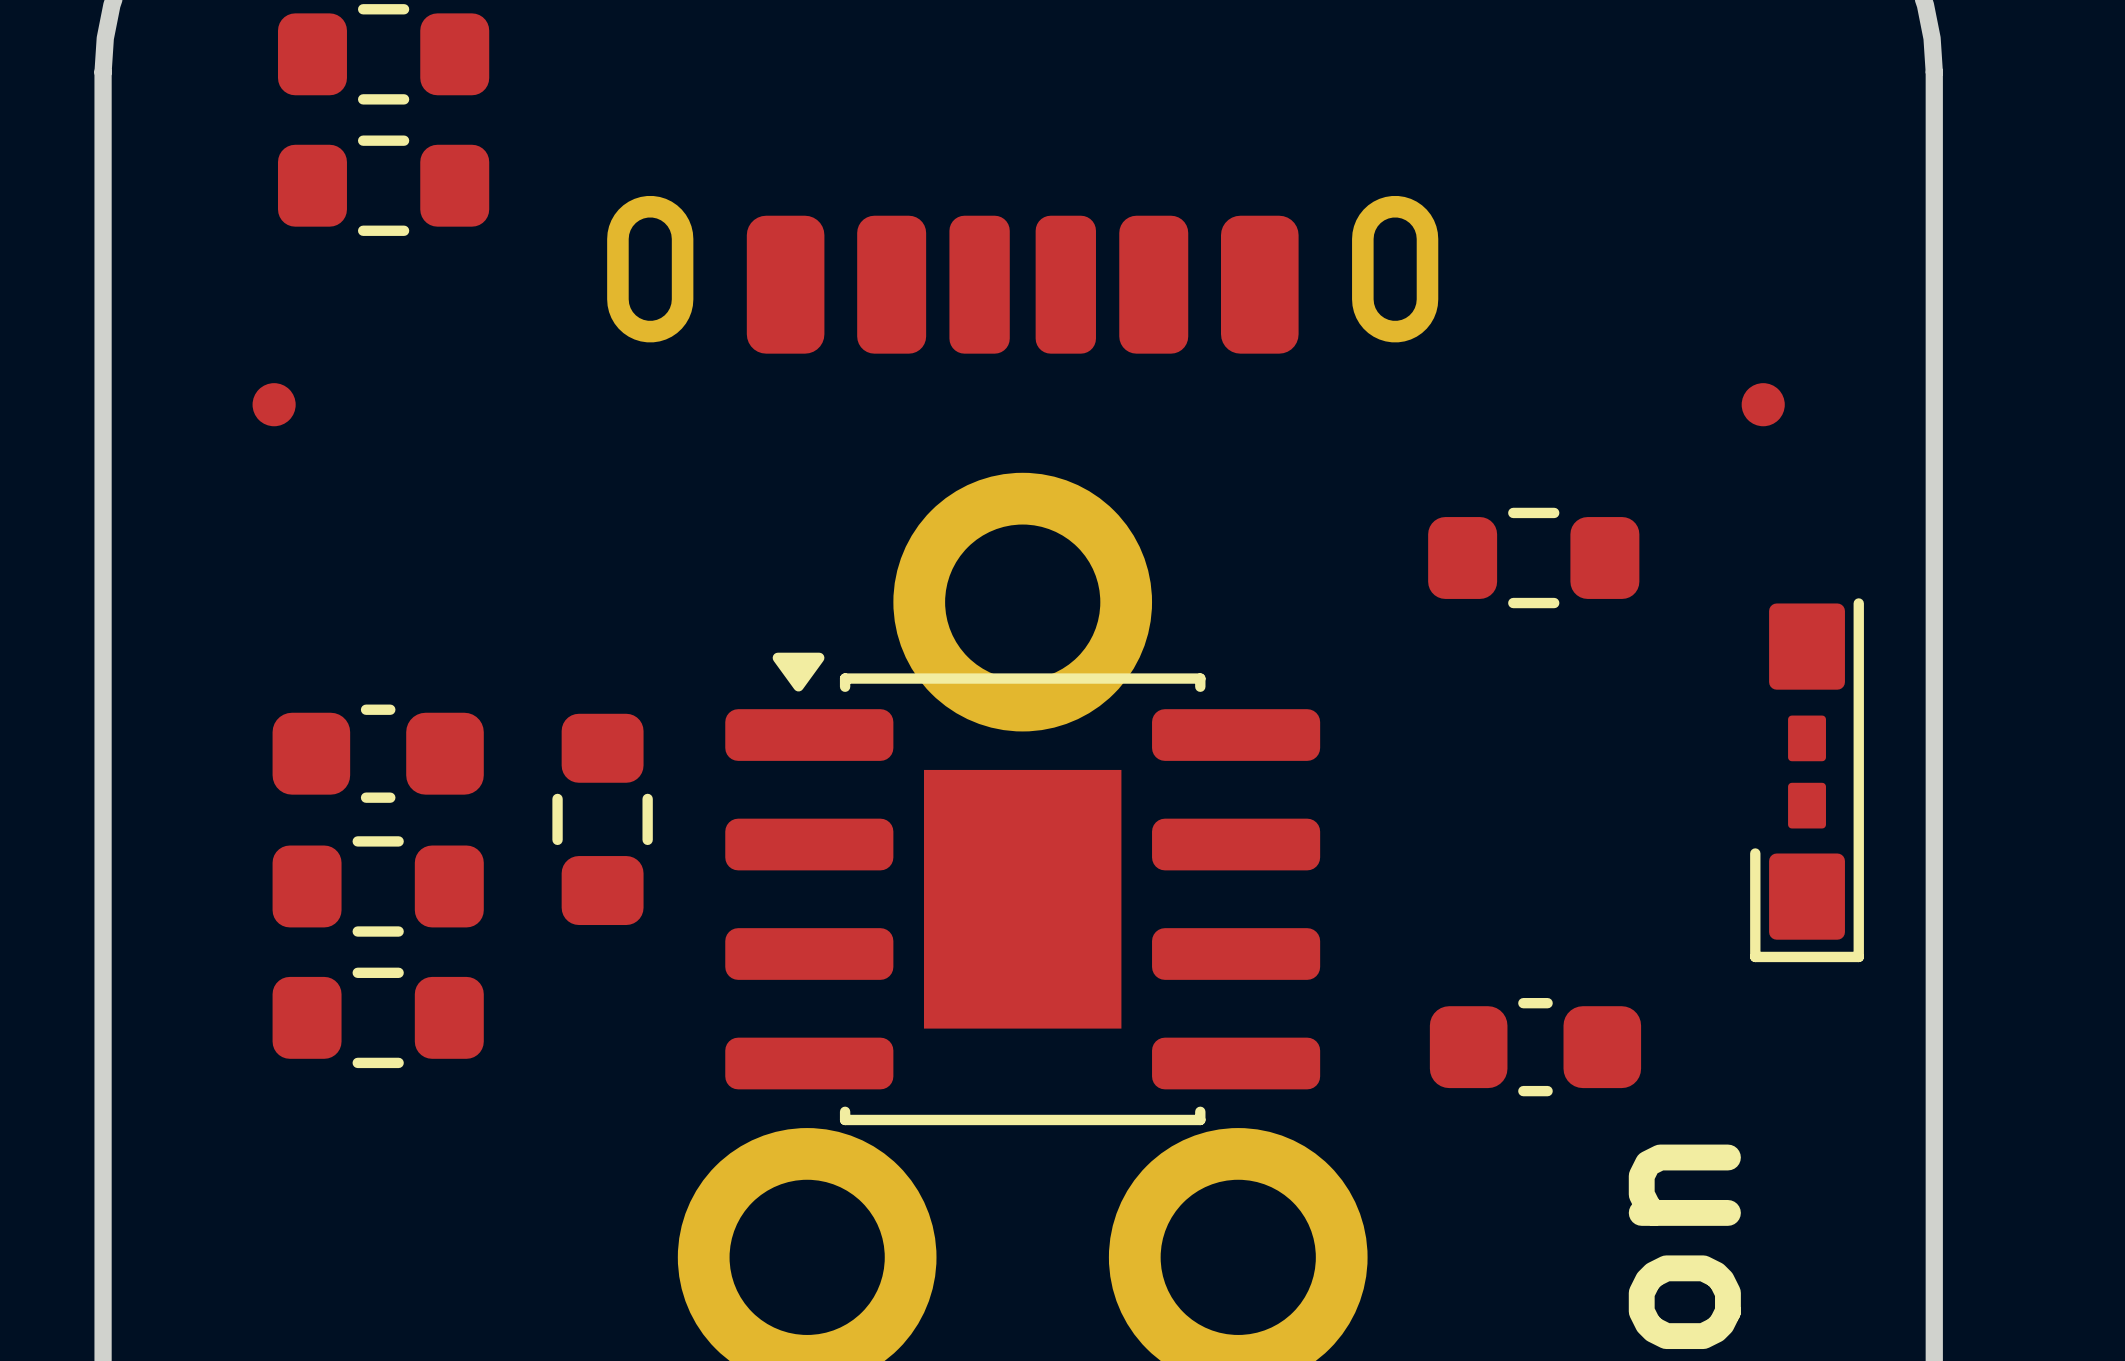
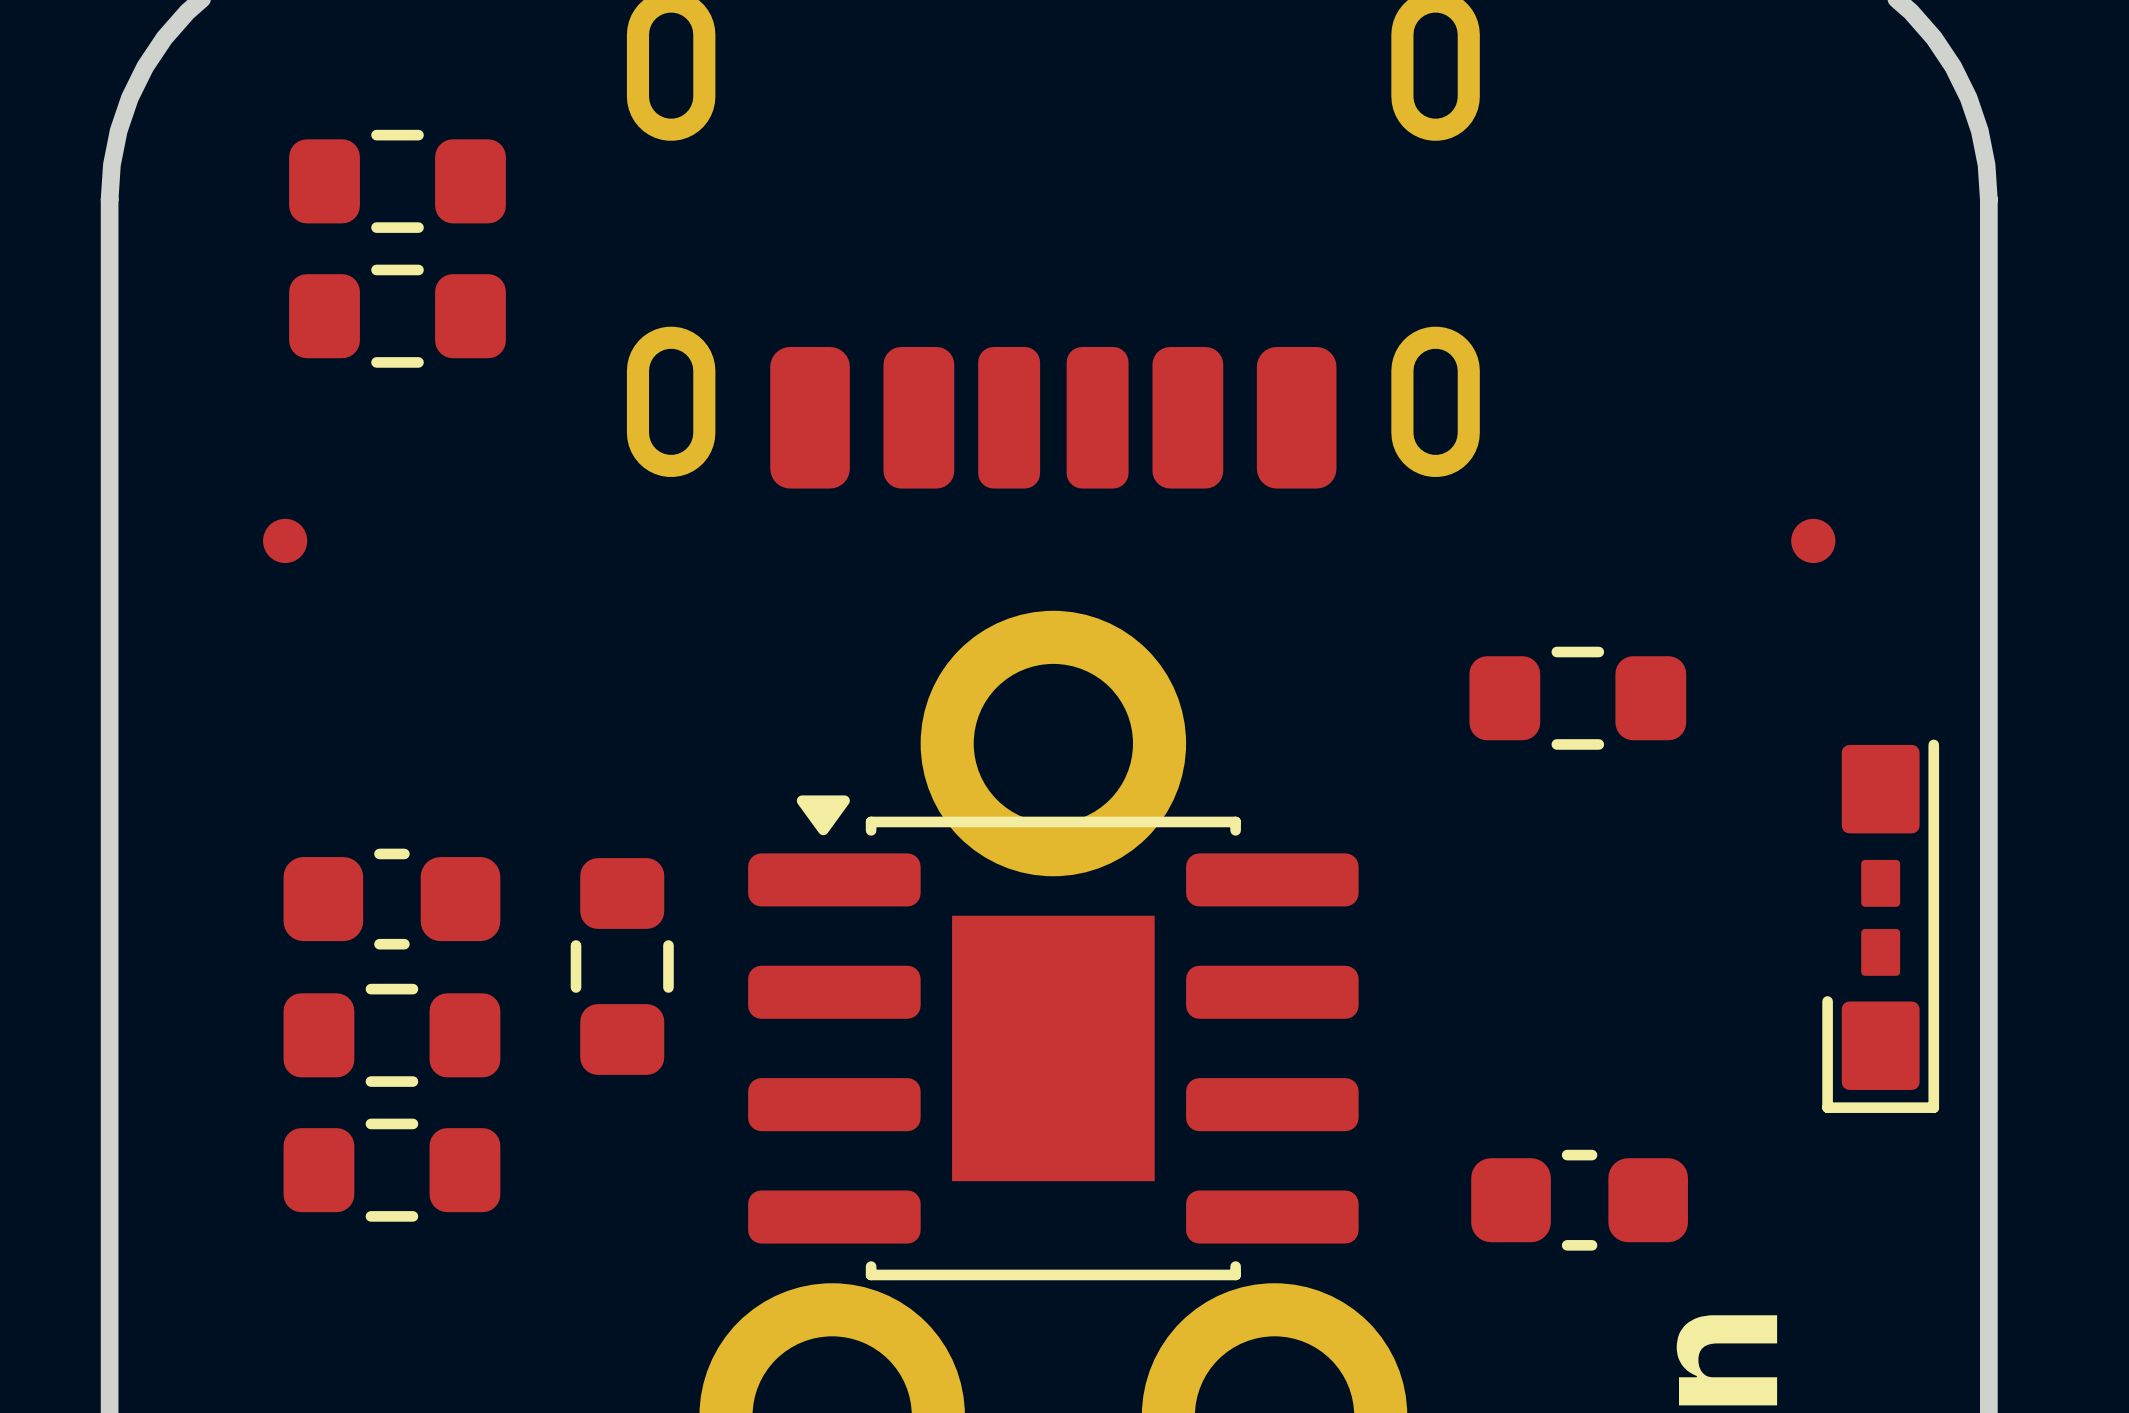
part position: (1807, 780) -> (1880, 926)

